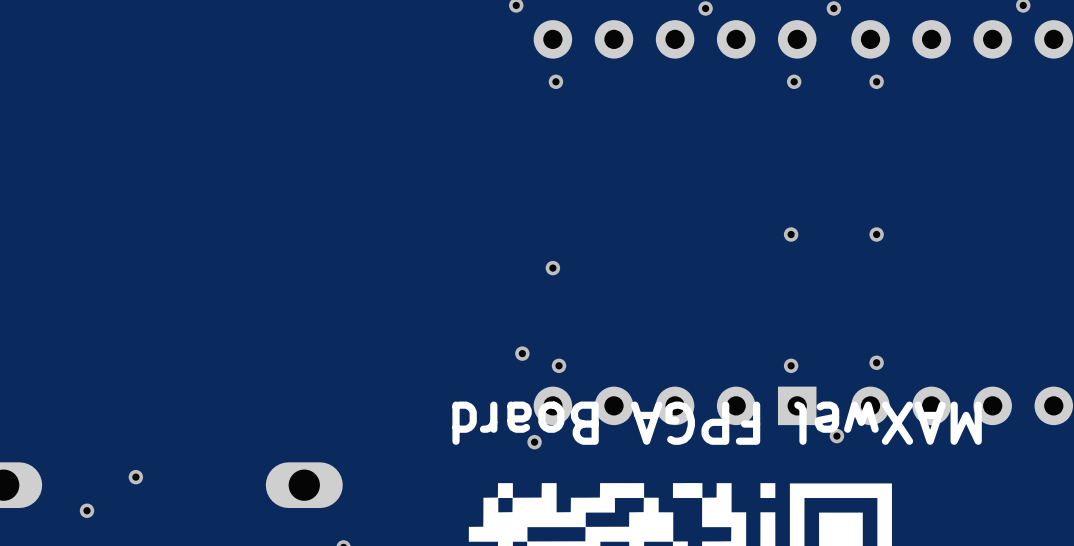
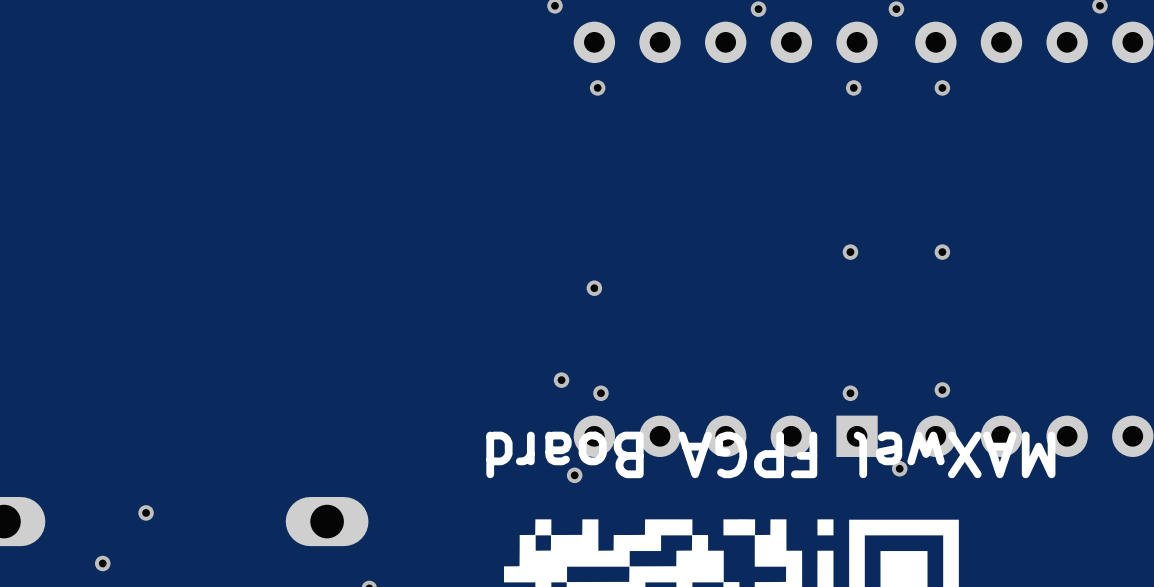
via position: (87, 510) -> (102, 563)

